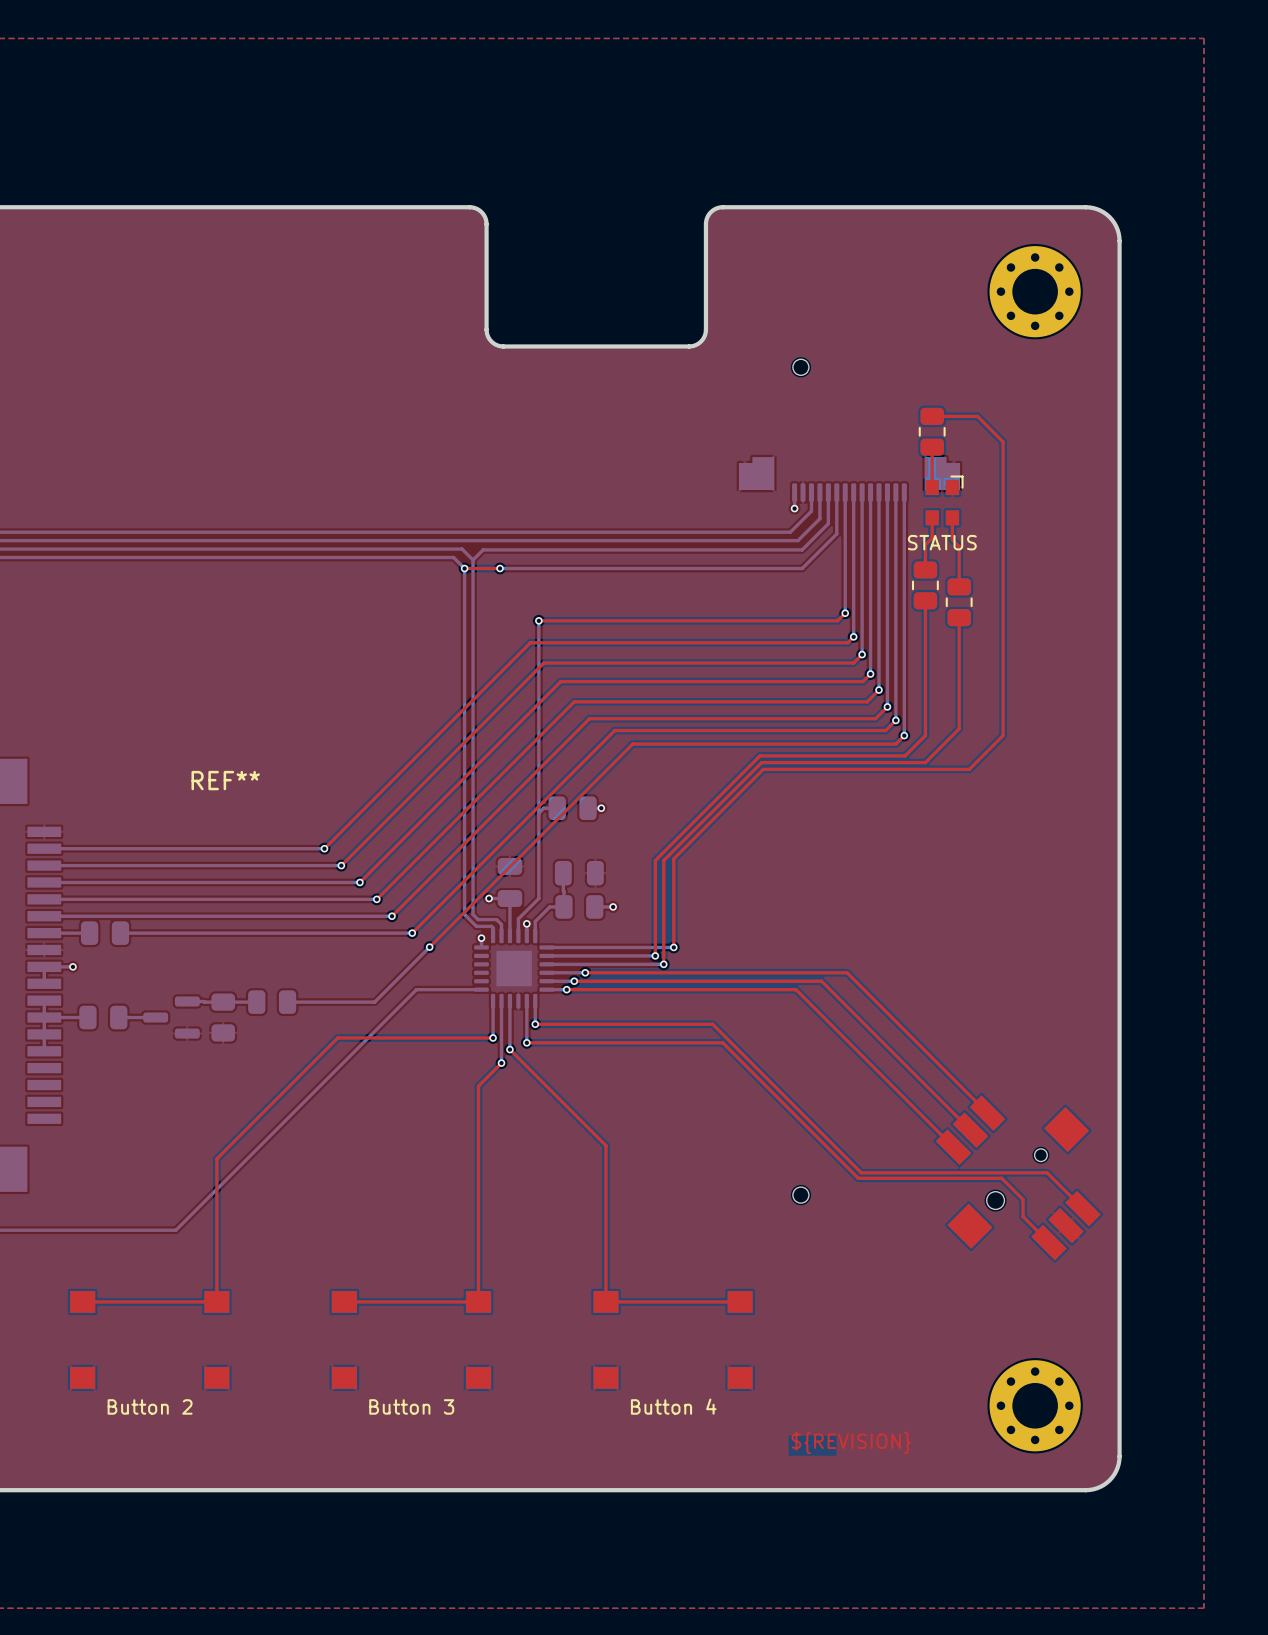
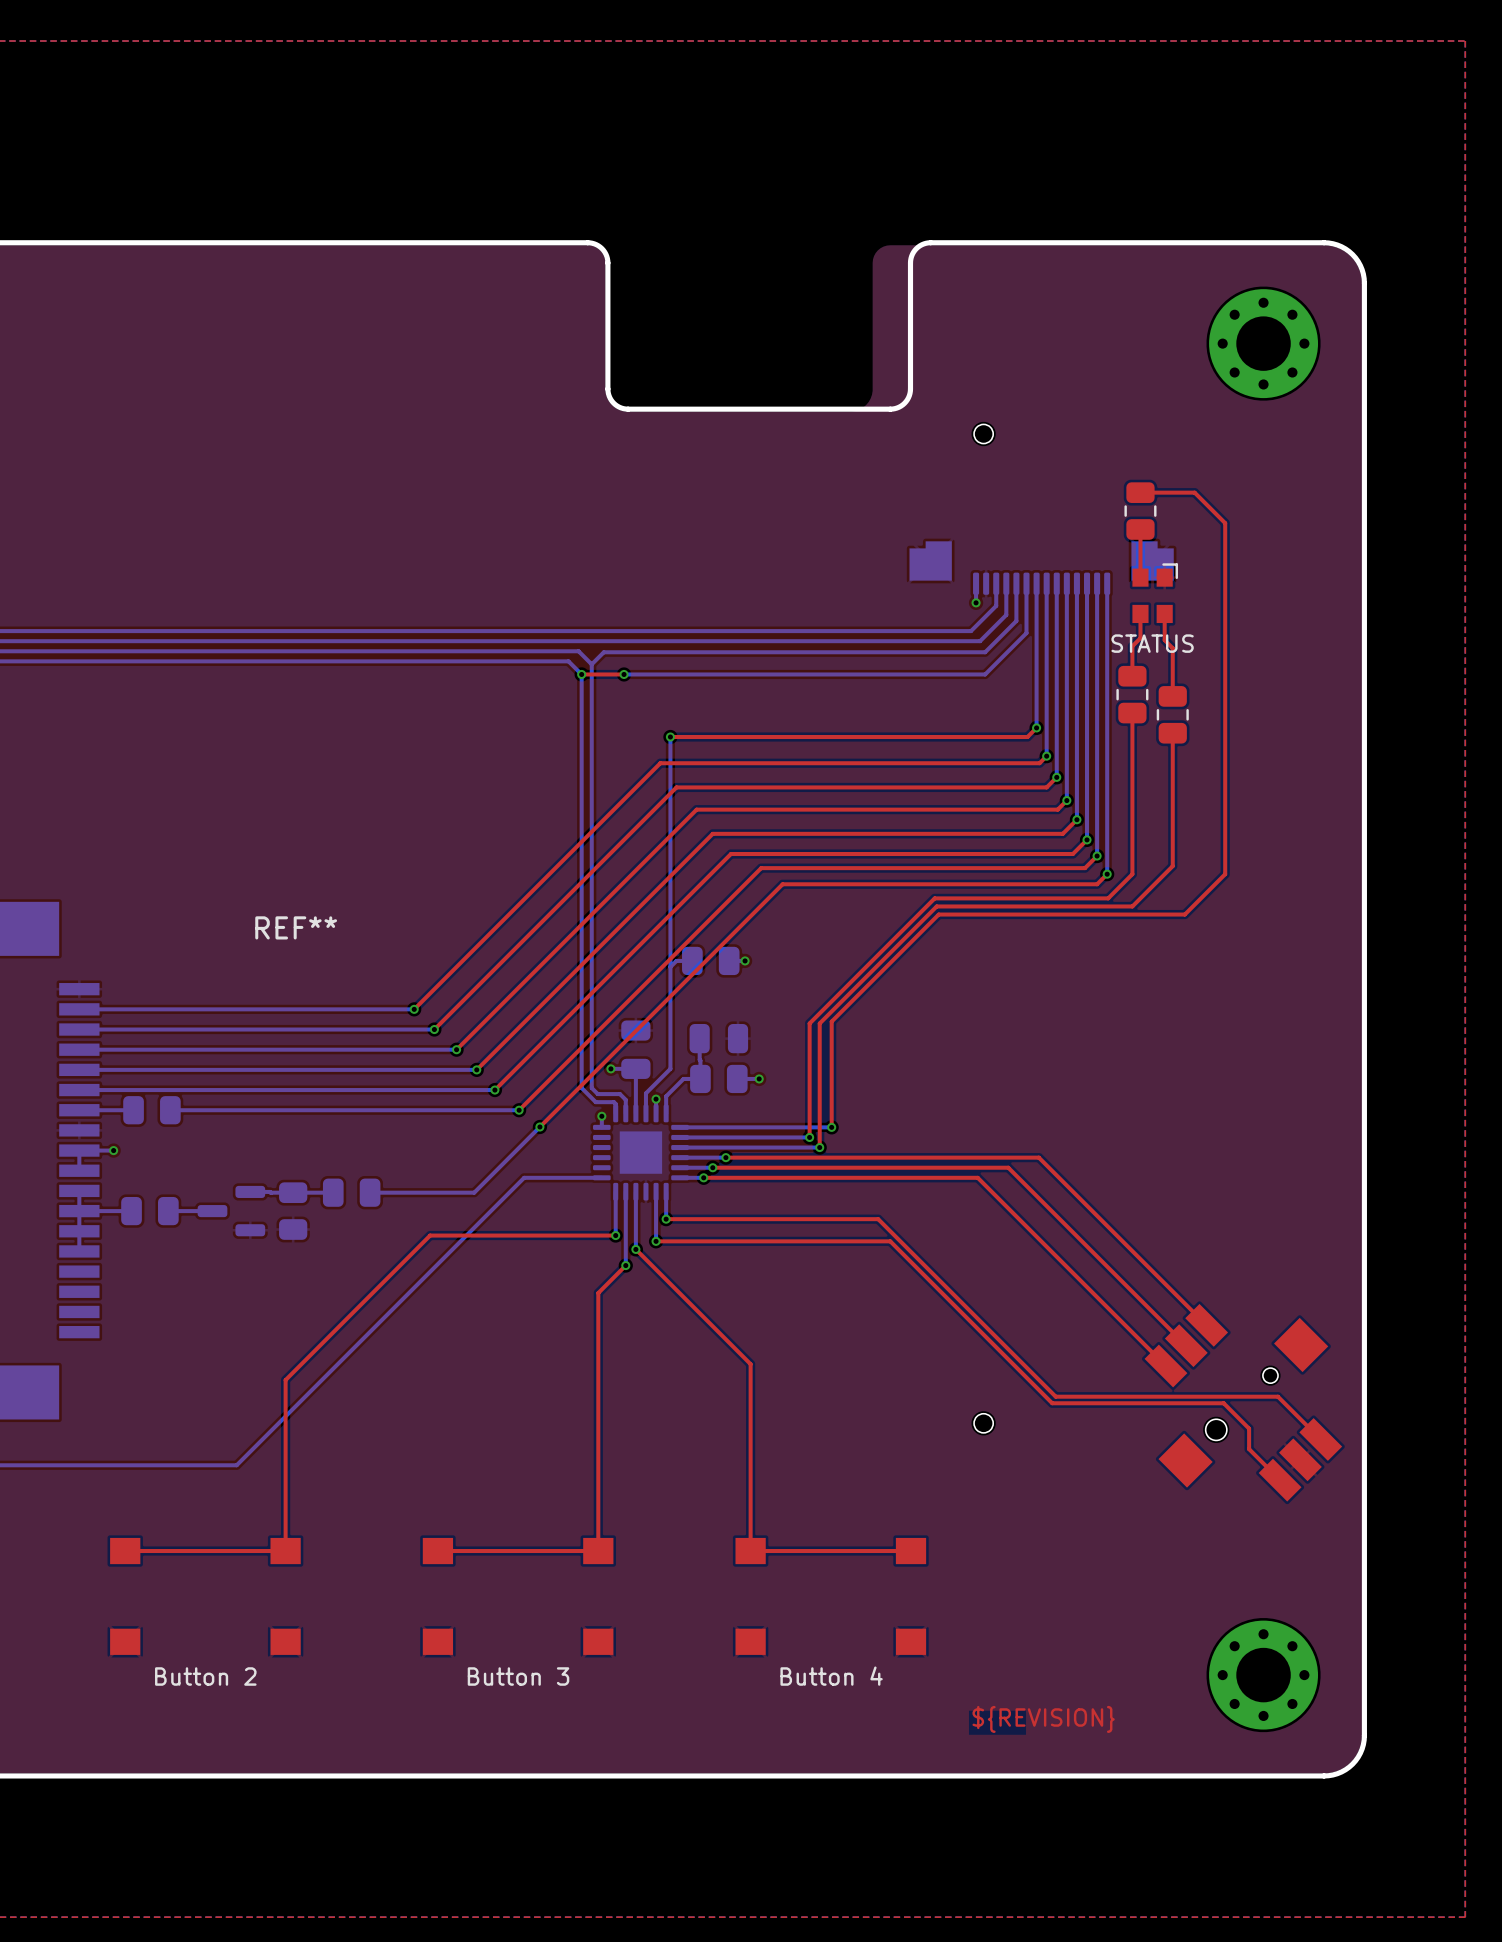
board edge: (756, 207) (719, 207) (712, 210) (707, 216) (705, 224) (705, 331) (699, 342) (689, 346) -> (930, 242) (918, 247) (913, 252) (910, 260) (910, 389) (908, 397) (902, 404) (894, 408) (849, 409)

